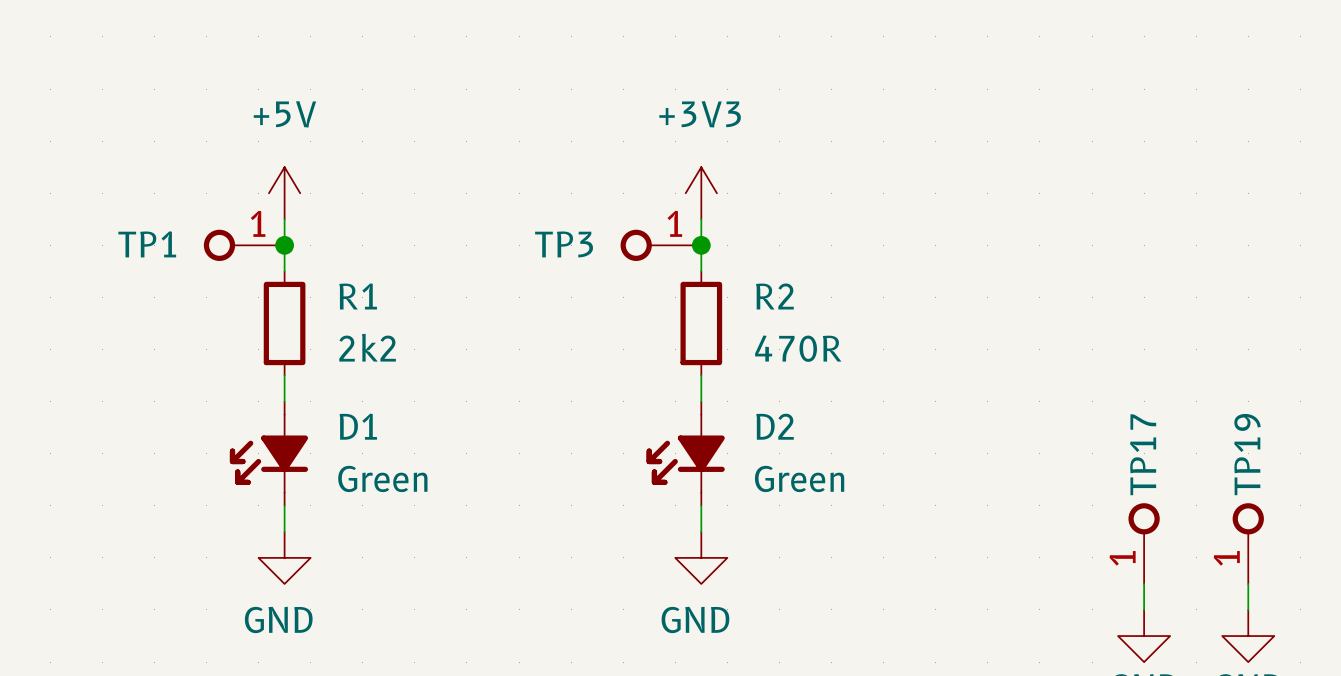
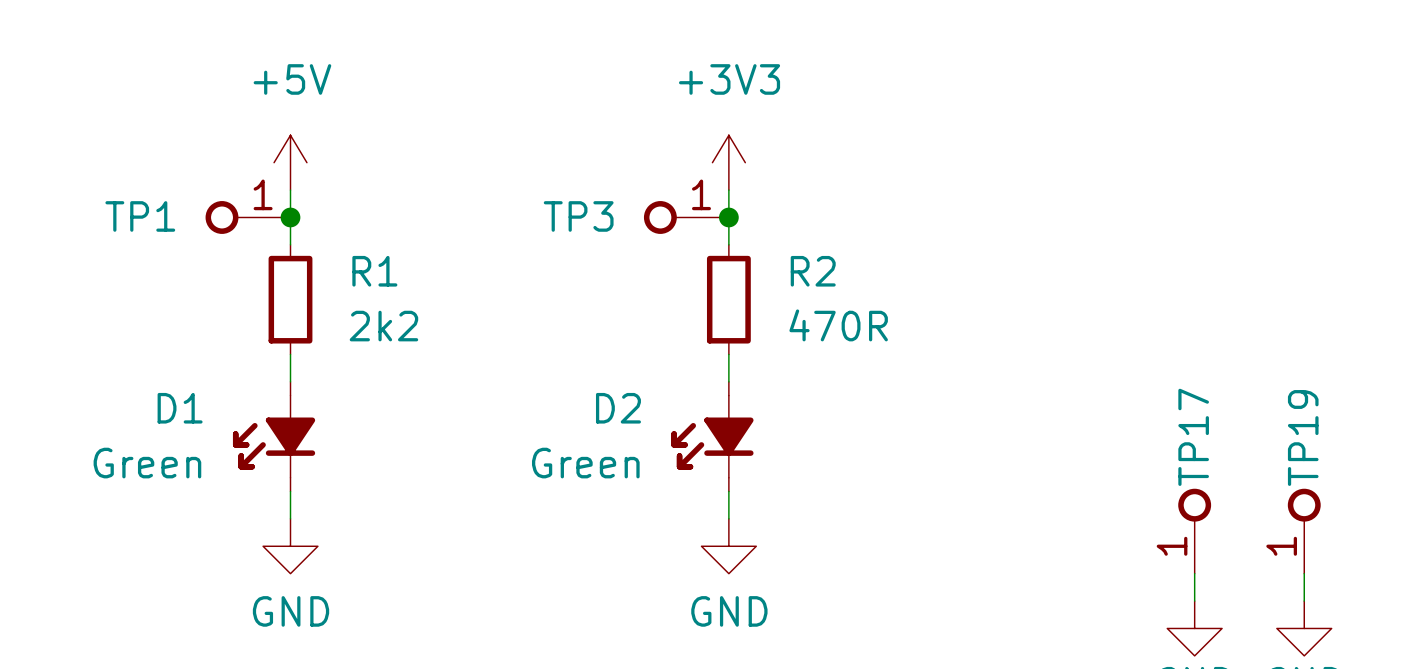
D1 name position: D1 (358, 426) -> D1 (180, 408)
D2 name position: D2 (775, 426) -> D2 (618, 408)
D1 text position: Green (382, 478) -> Green (147, 463)
D2 text position: Green (799, 478) -> Green (585, 463)

